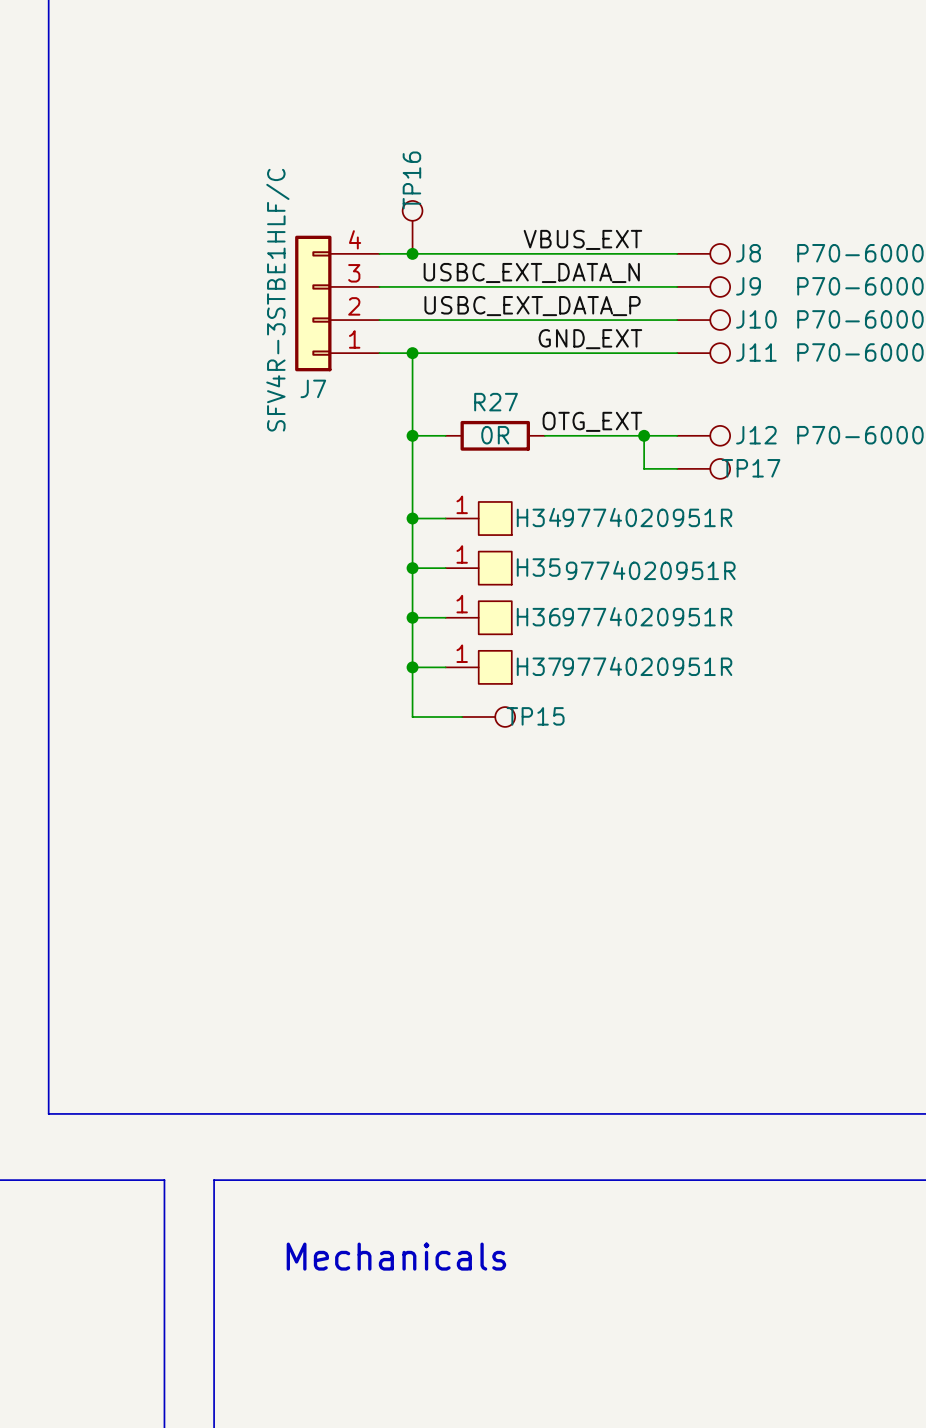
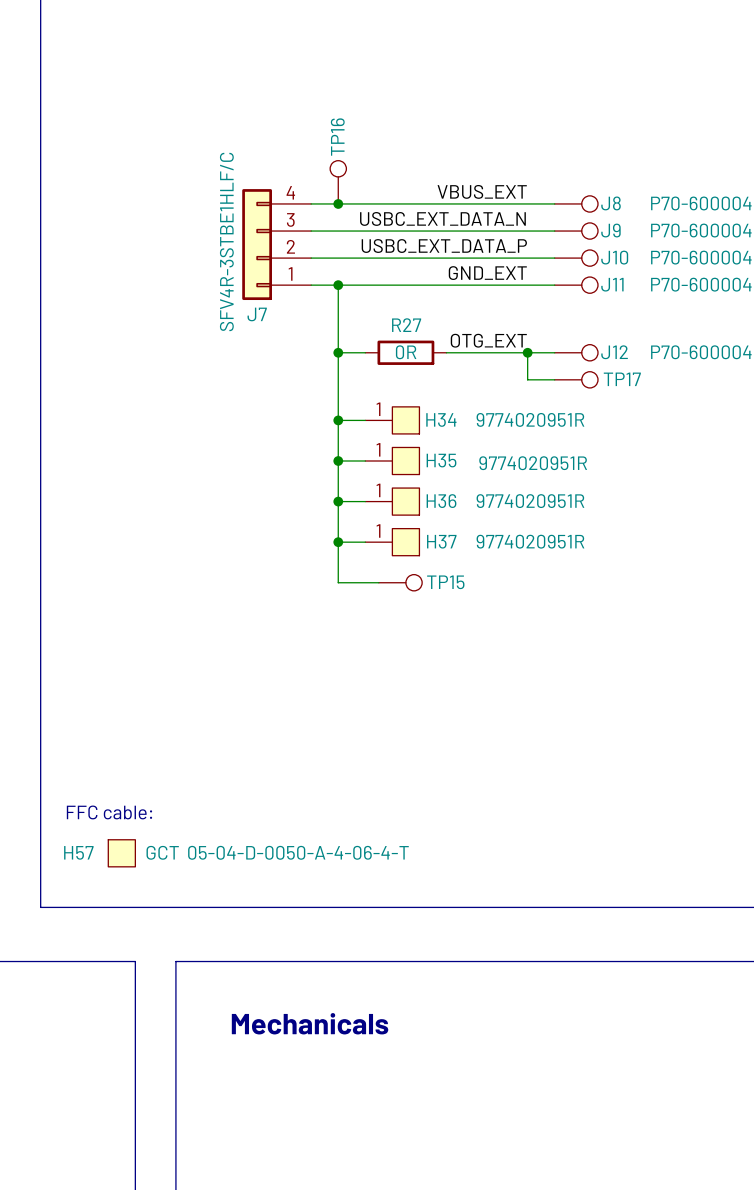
text: none -> FFC cable: (109, 812)
H57: none -> 05-04-D-0050-A-4-06-4-T (121, 853)

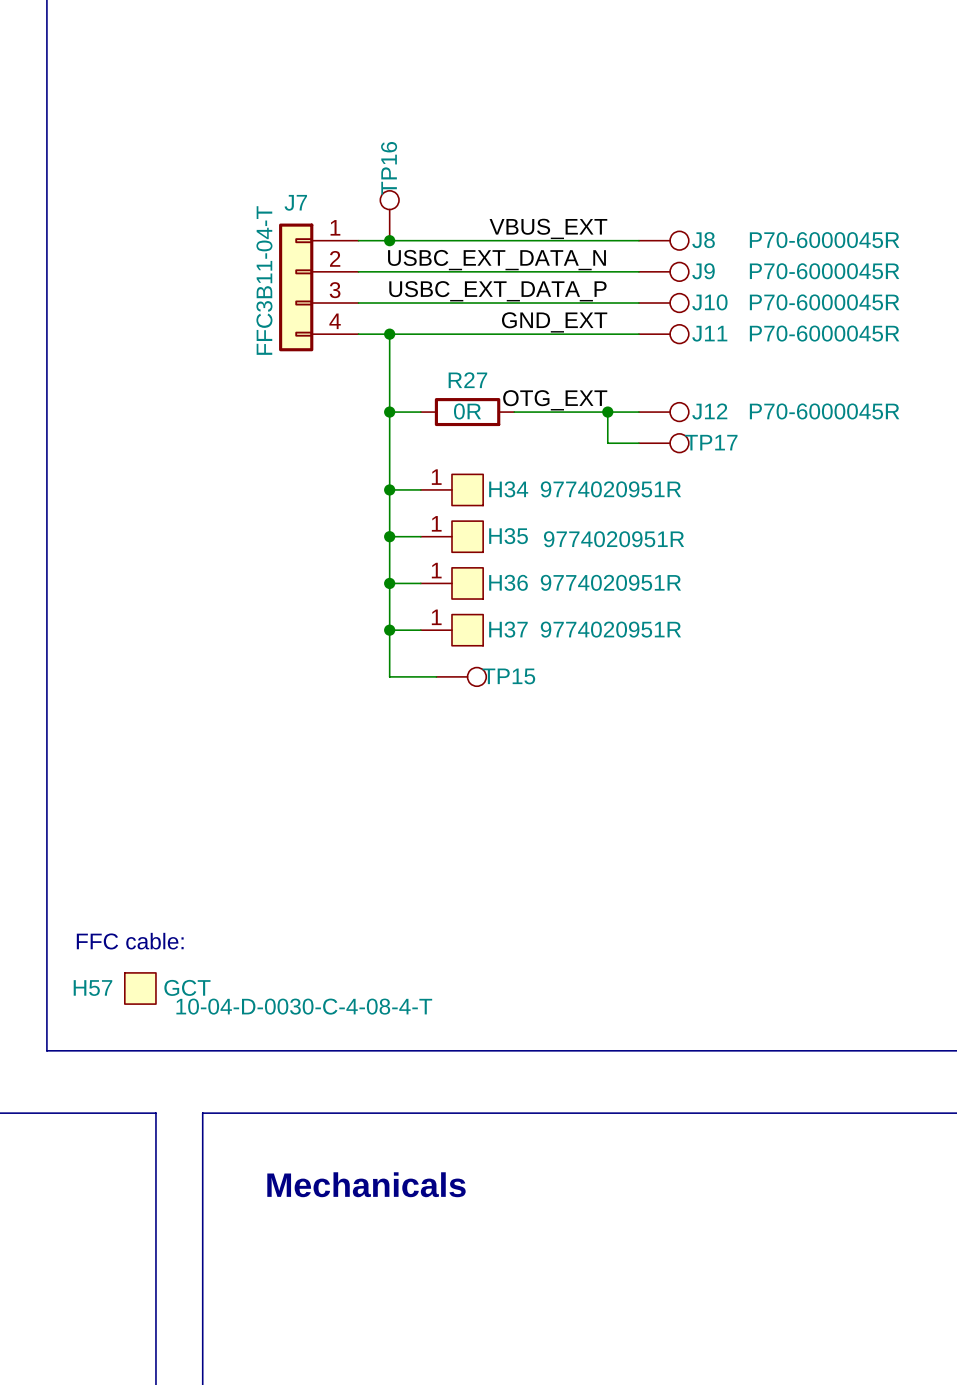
J7 text: SFV4R-3STBE1HLF/C (226, 241) -> FFC3B11-04-T (264, 280)
J7 flip: as is (257, 244) -> up-down (296, 287)
H57 value: 05-04-D-0050-A-4-06-4-T (298, 852) -> 10-04-D-0030-C-4-08-4-T (304, 1006)

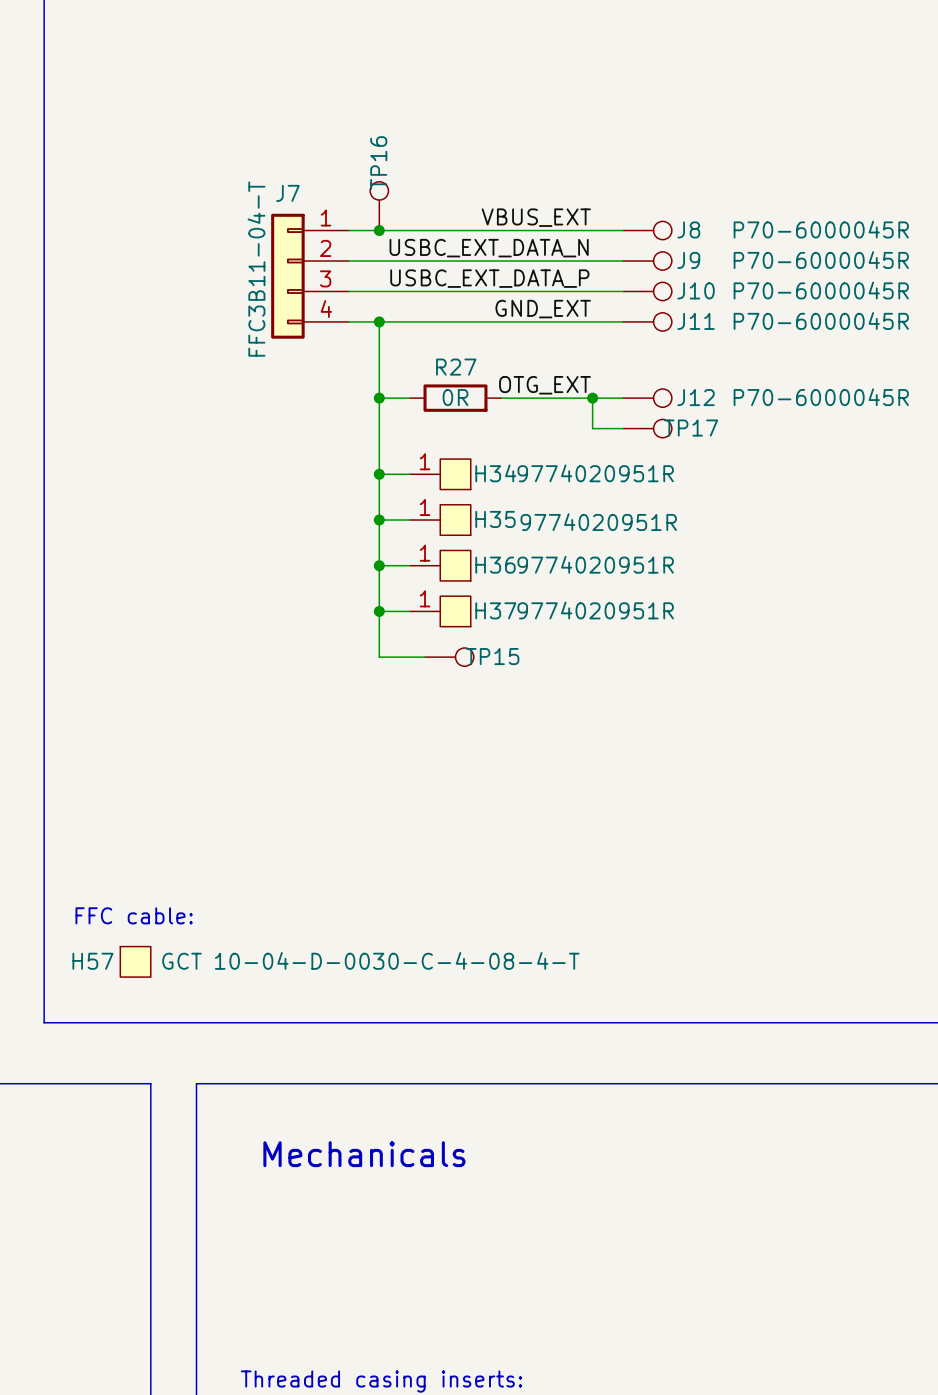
H57 value position: 10-04-D-0030-C-4-08-4-T (304, 1006) -> 10-04-D-0030-C-4-08-4-T (397, 960)

